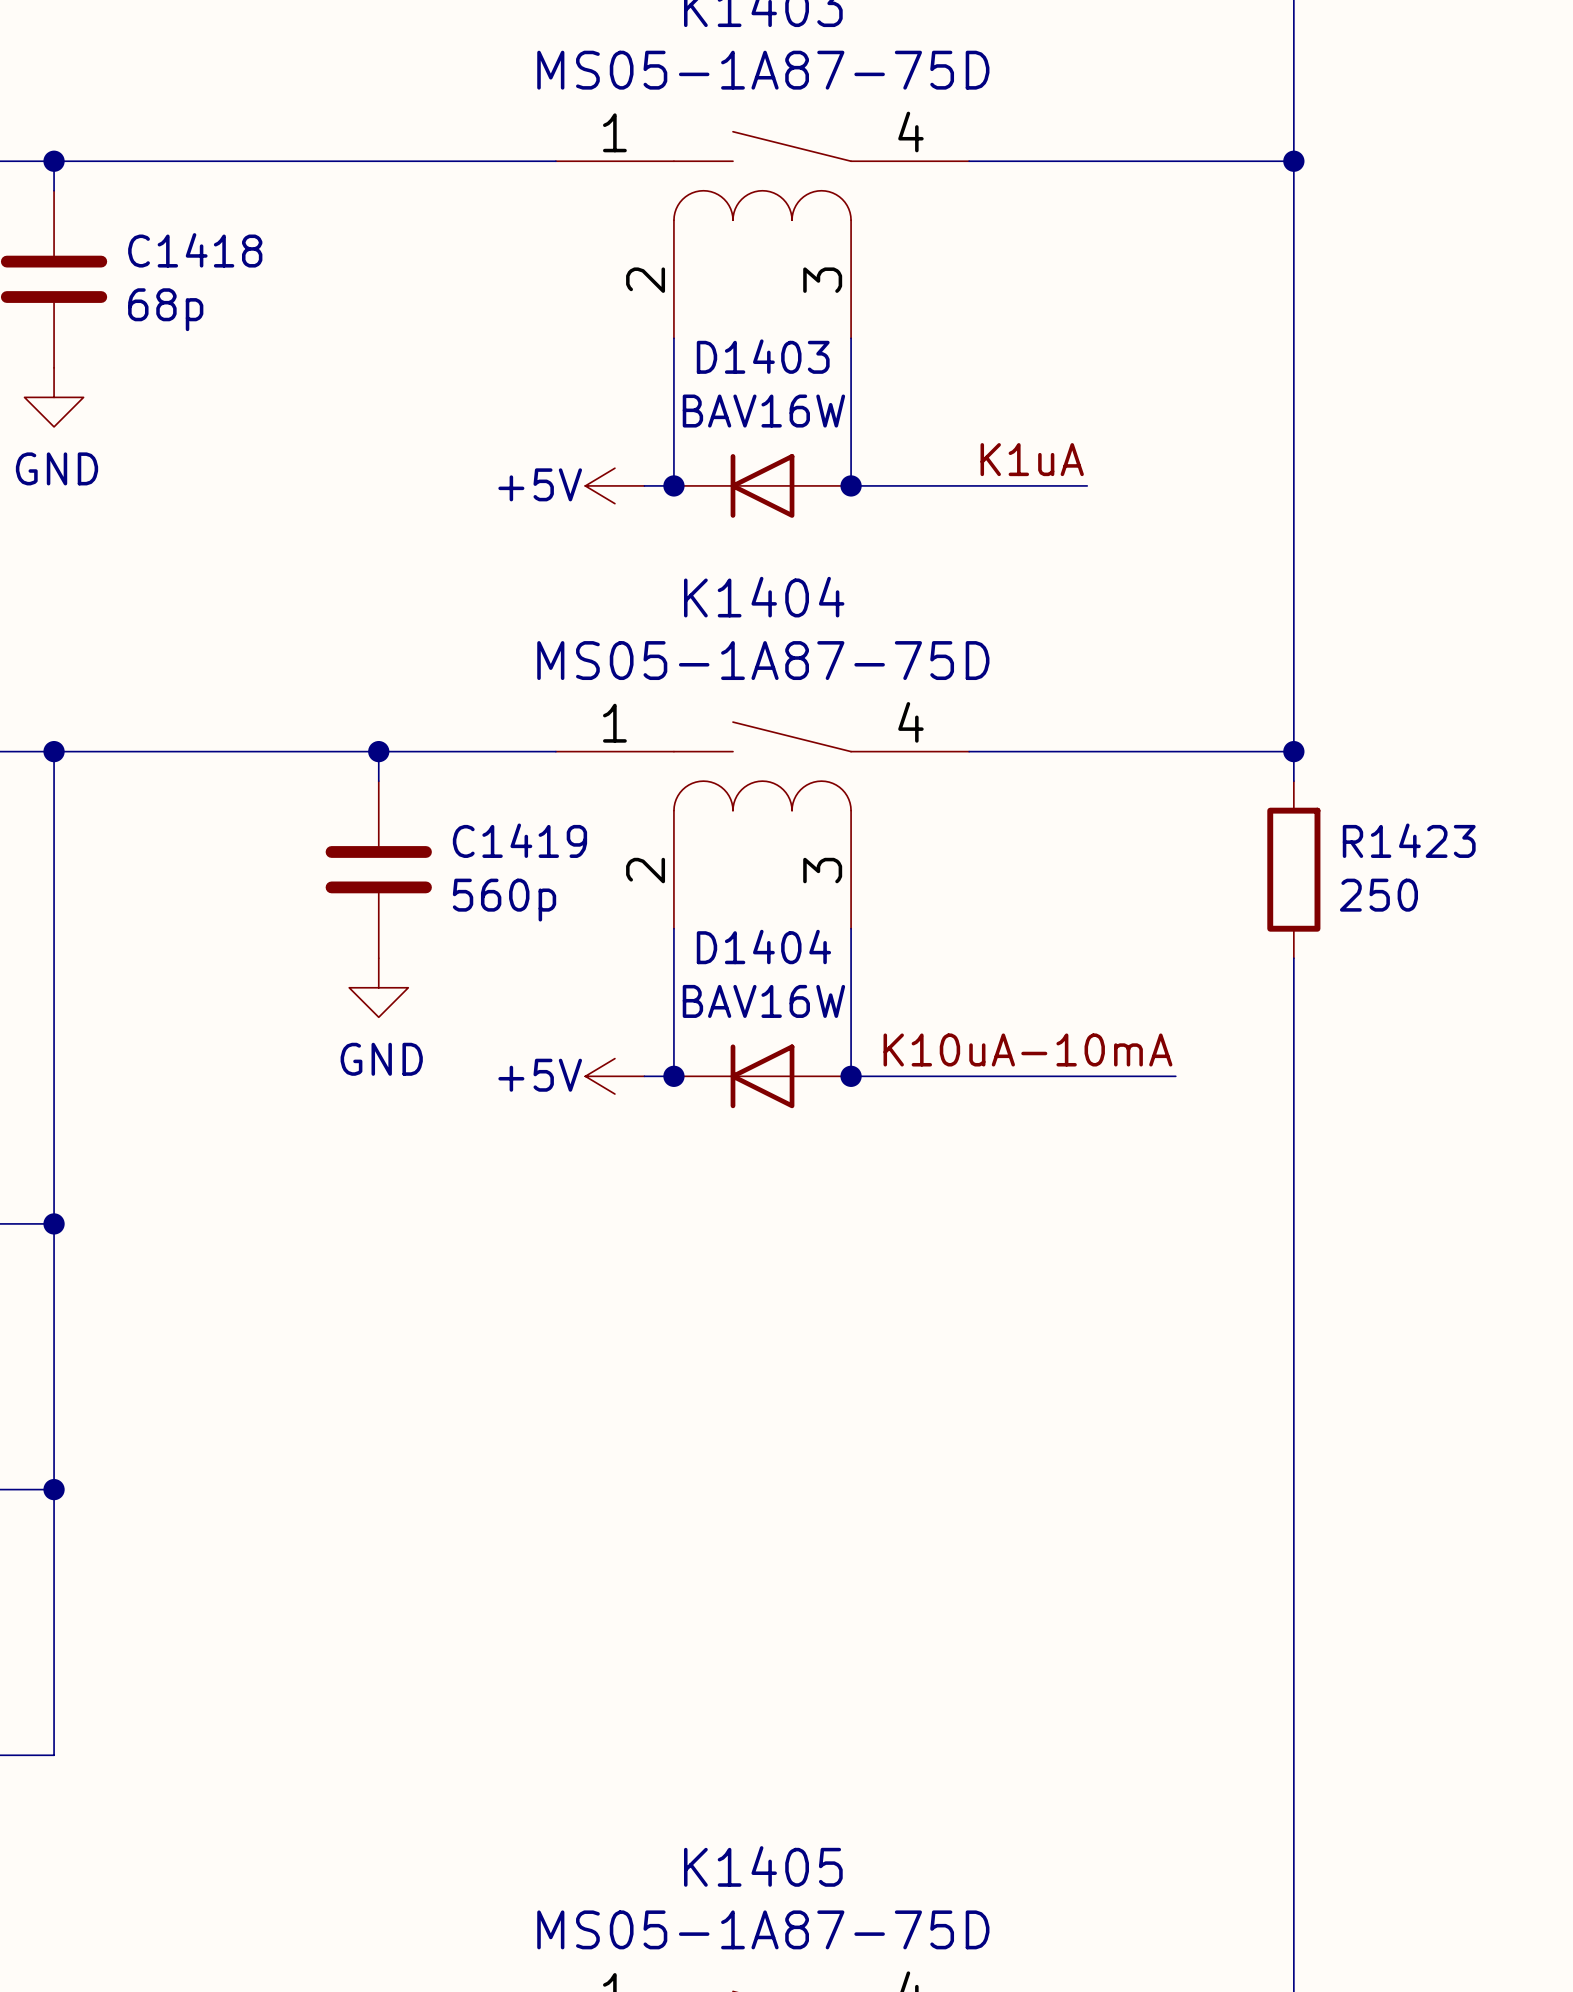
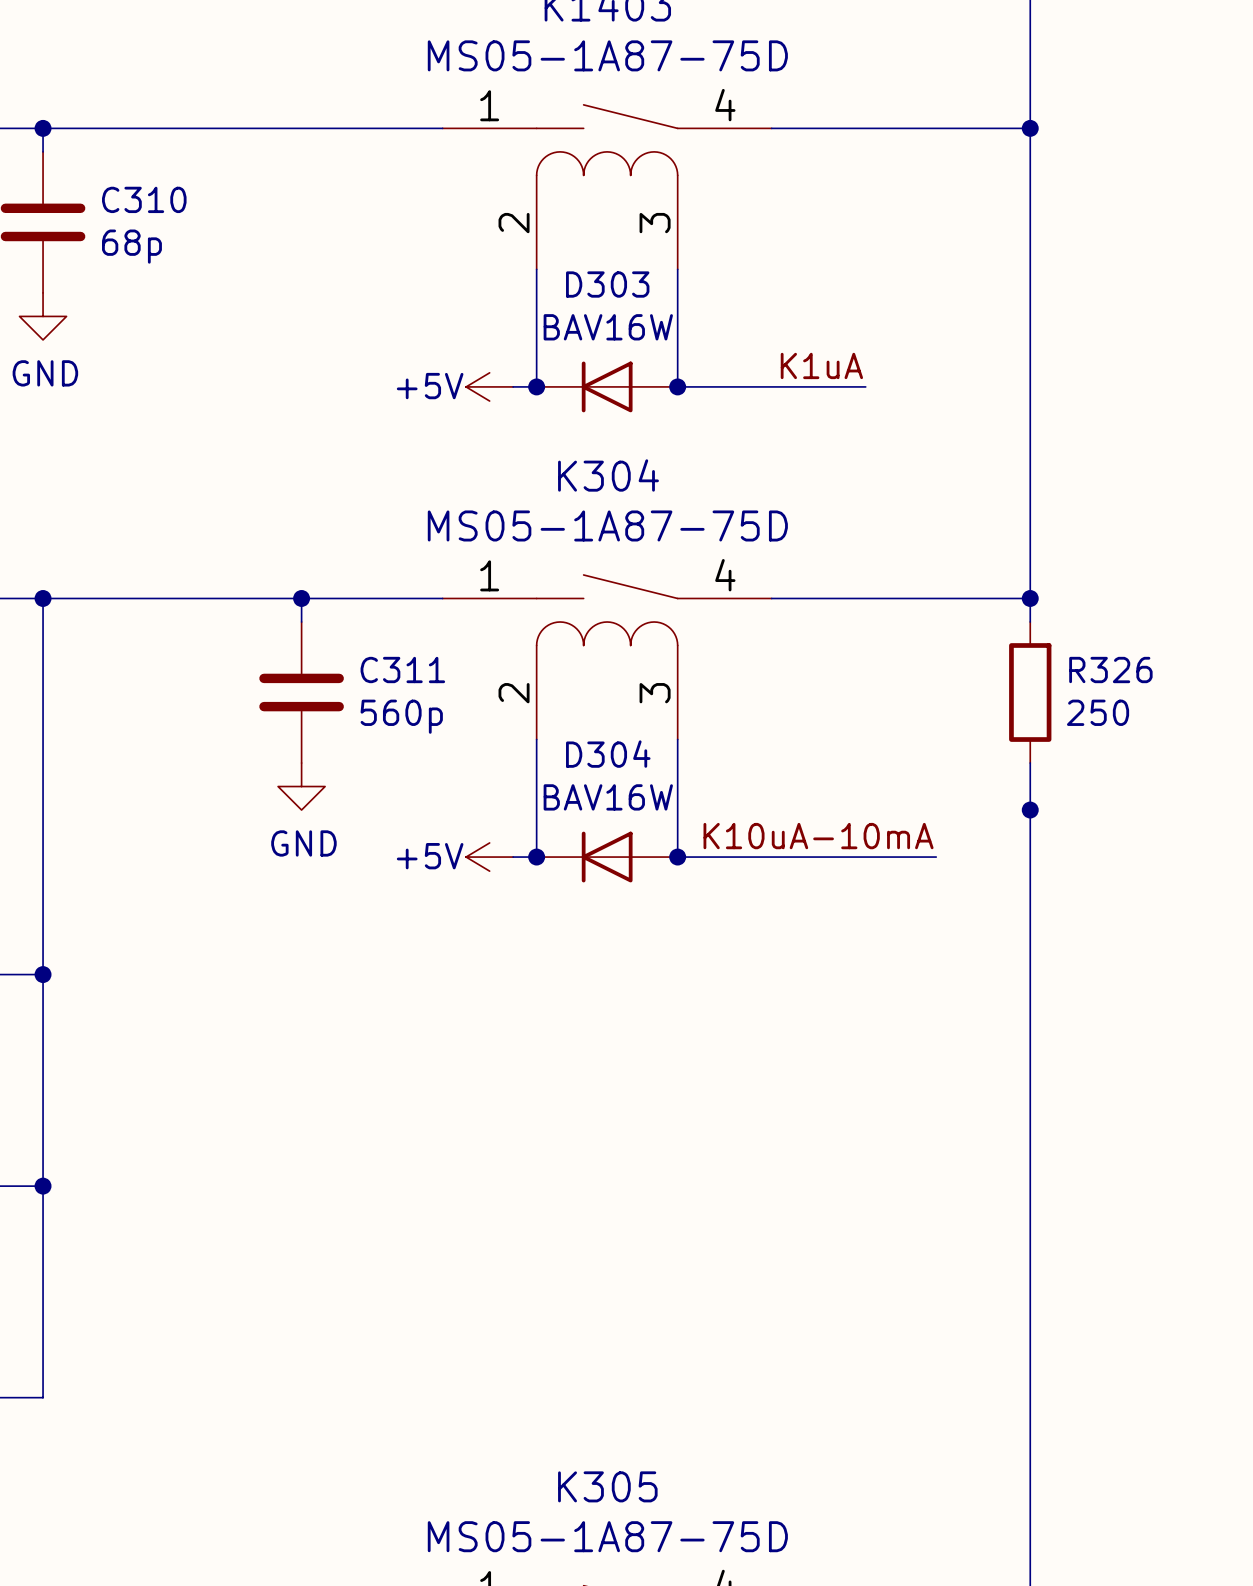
C1418 name: C1418 (195, 250) -> C310 (144, 199)
D1403 name: D1403 (763, 356) -> D303 (607, 284)
K1404 name: K1404 (764, 597) -> K304 (608, 475)
C1419 name: C1419 (519, 840) -> C311 (402, 670)
R1423 name: R1423 (1409, 840) -> R326 (1110, 670)
D1404 name: D1404 (763, 947) -> D304 (608, 754)
junction: none -> (1030, 810)
K1405 name: K1405 (763, 1866) -> K305 (607, 1486)

